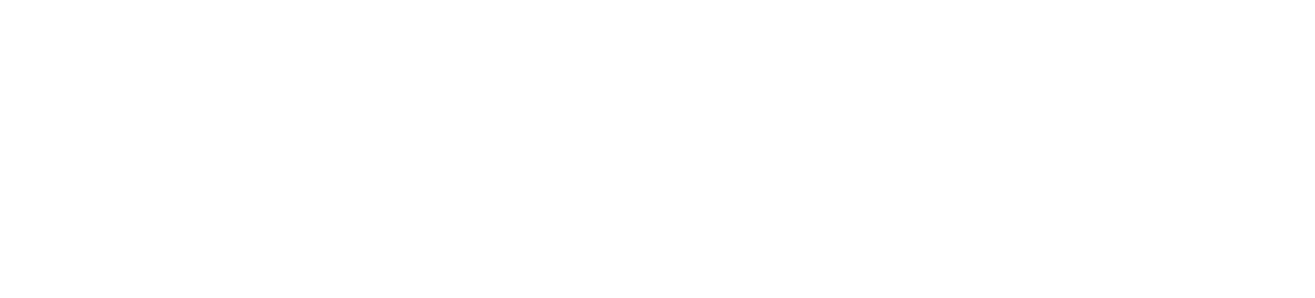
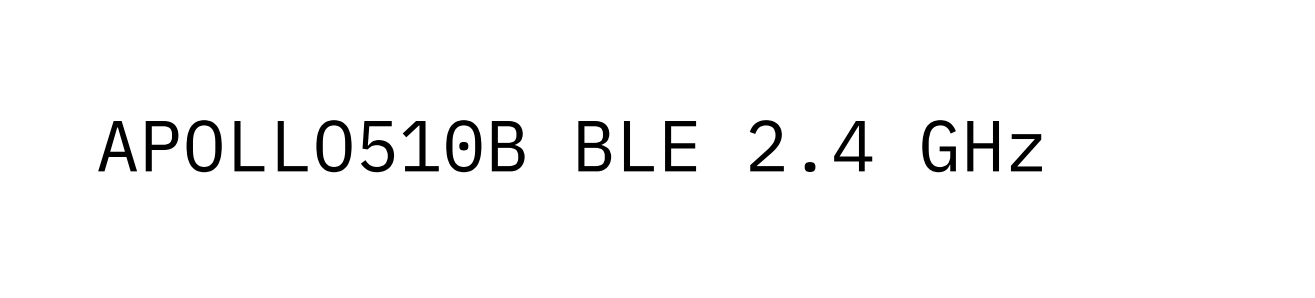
text: none -> APOLLO510B BLE 2.4 GHz (570, 146)

